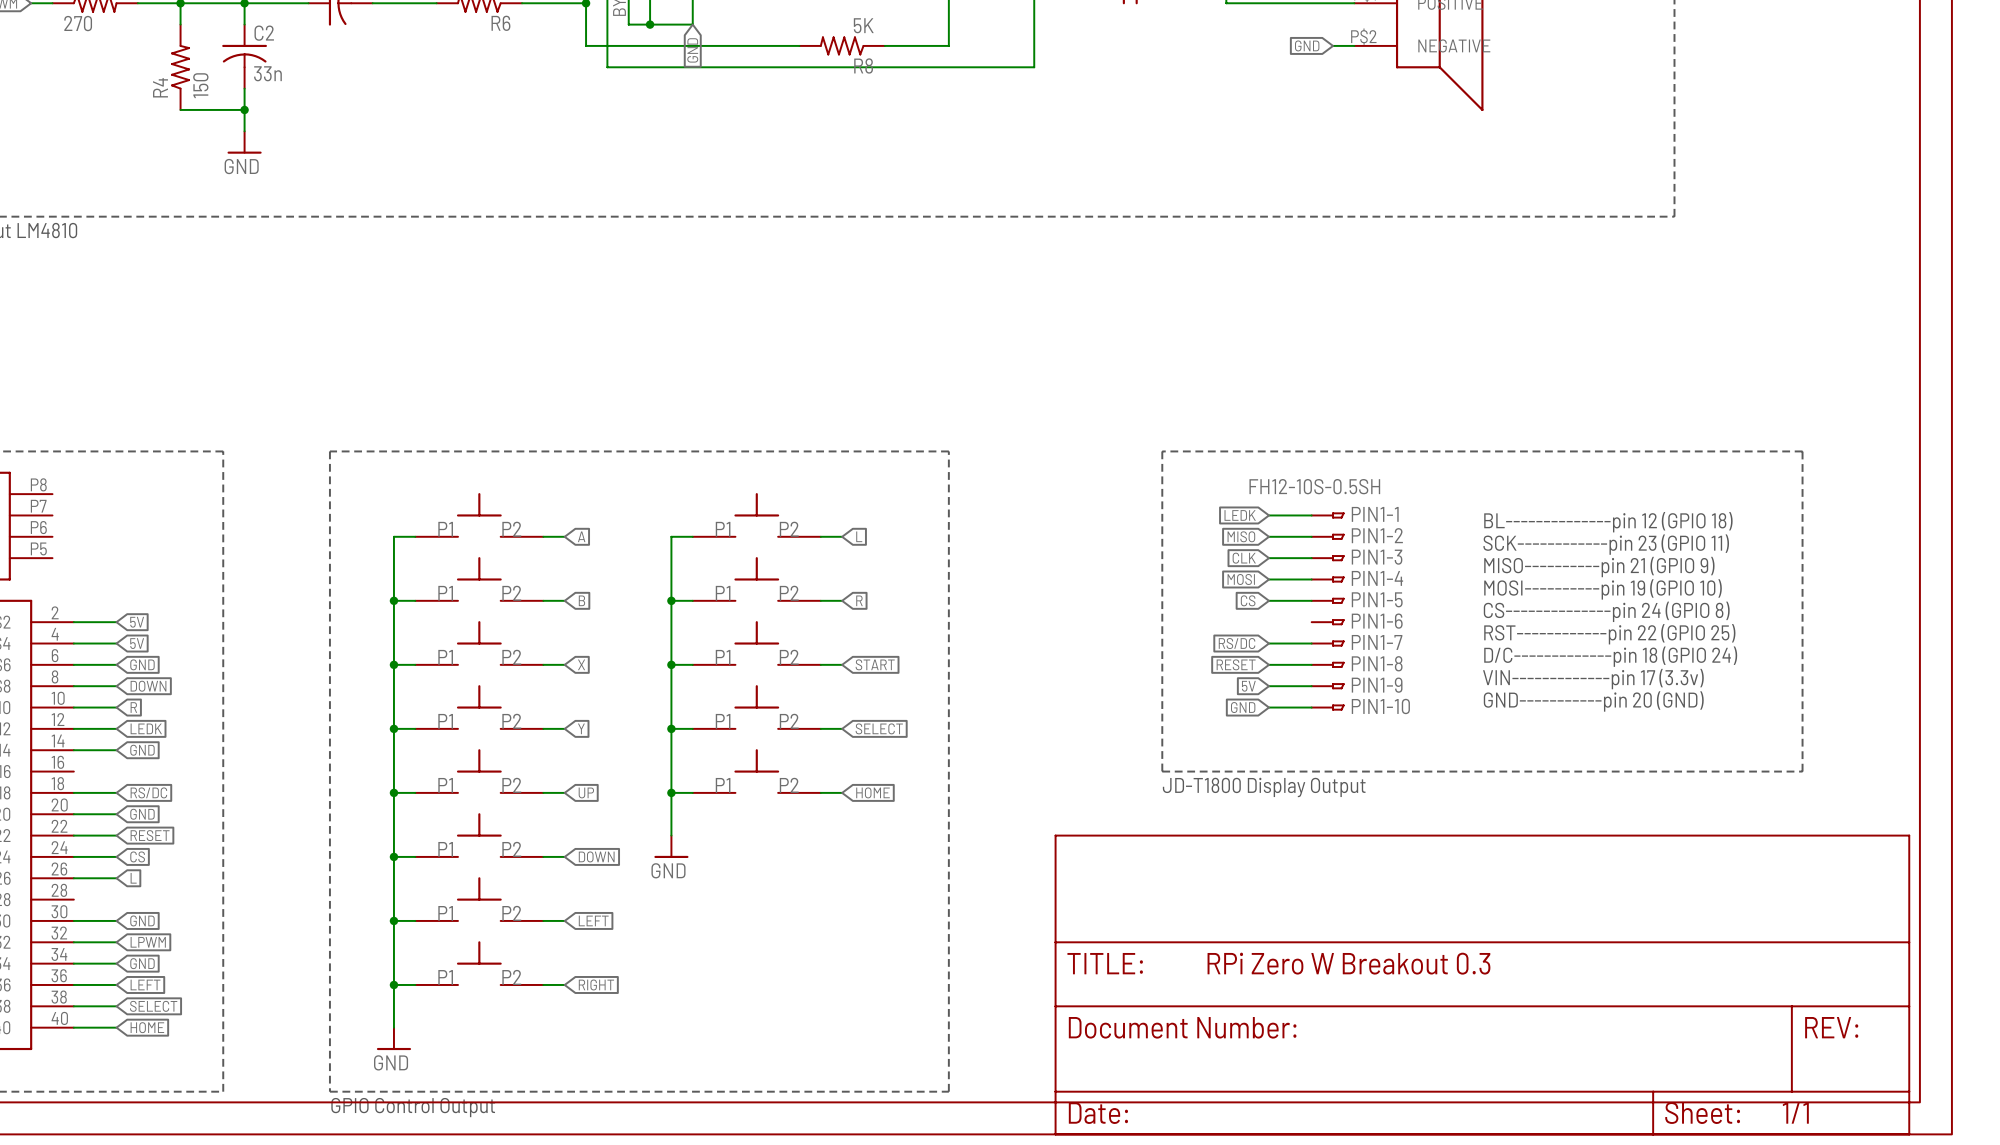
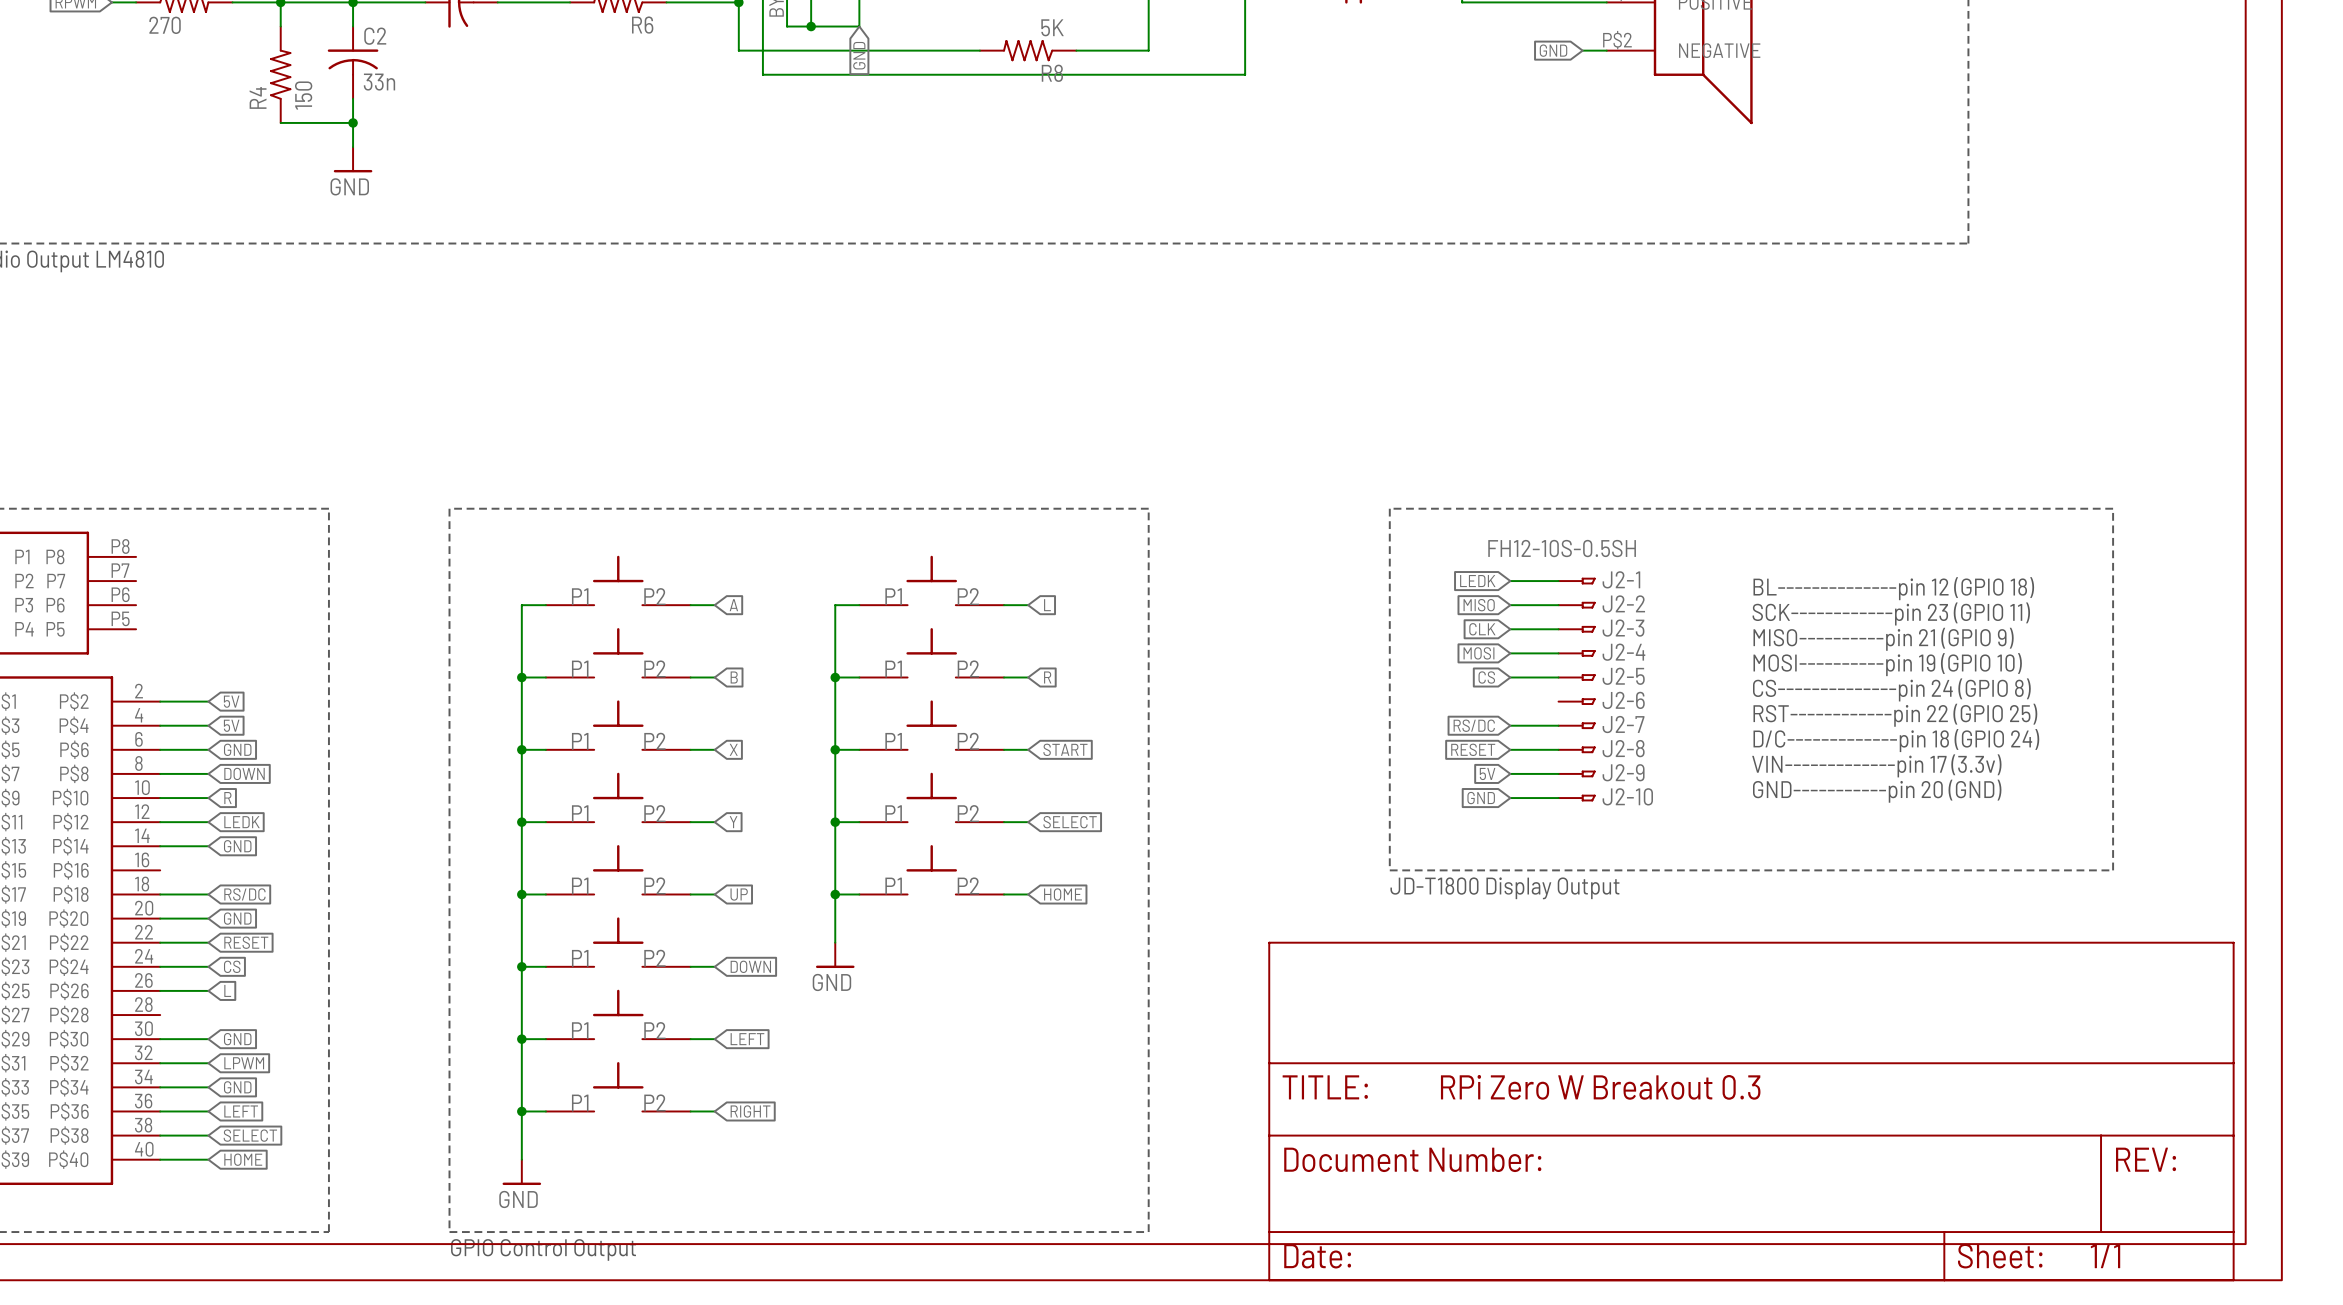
PIN1-1 name: PIN1-1 (1375, 514) -> J2-1 (1621, 579)
PIN1-2 name: PIN1-2 (1377, 535) -> J2-2 (1623, 603)
PIN1-3 name: PIN1-3 (1377, 557) -> J2-3 (1623, 628)
PIN1-4 name: PIN1-4 (1377, 578) -> J2-4 (1623, 652)
PIN1-5 name: PIN1-5 (1377, 599) -> J2-5 (1623, 676)
PIN1-6 name: PIN1-6 (1377, 621) -> J2-6 (1623, 700)
PIN1-7 name: PIN1-7 (1377, 642) -> J2-7 (1623, 724)
PIN1-8 name: PIN1-8 (1377, 663) -> J2-8 (1623, 748)
PIN1-9 name: PIN1-9 (1377, 685) -> J2-9 (1623, 772)
PIN1-10 name: PIN1-10 (1380, 706) -> J2-10 (1627, 796)

